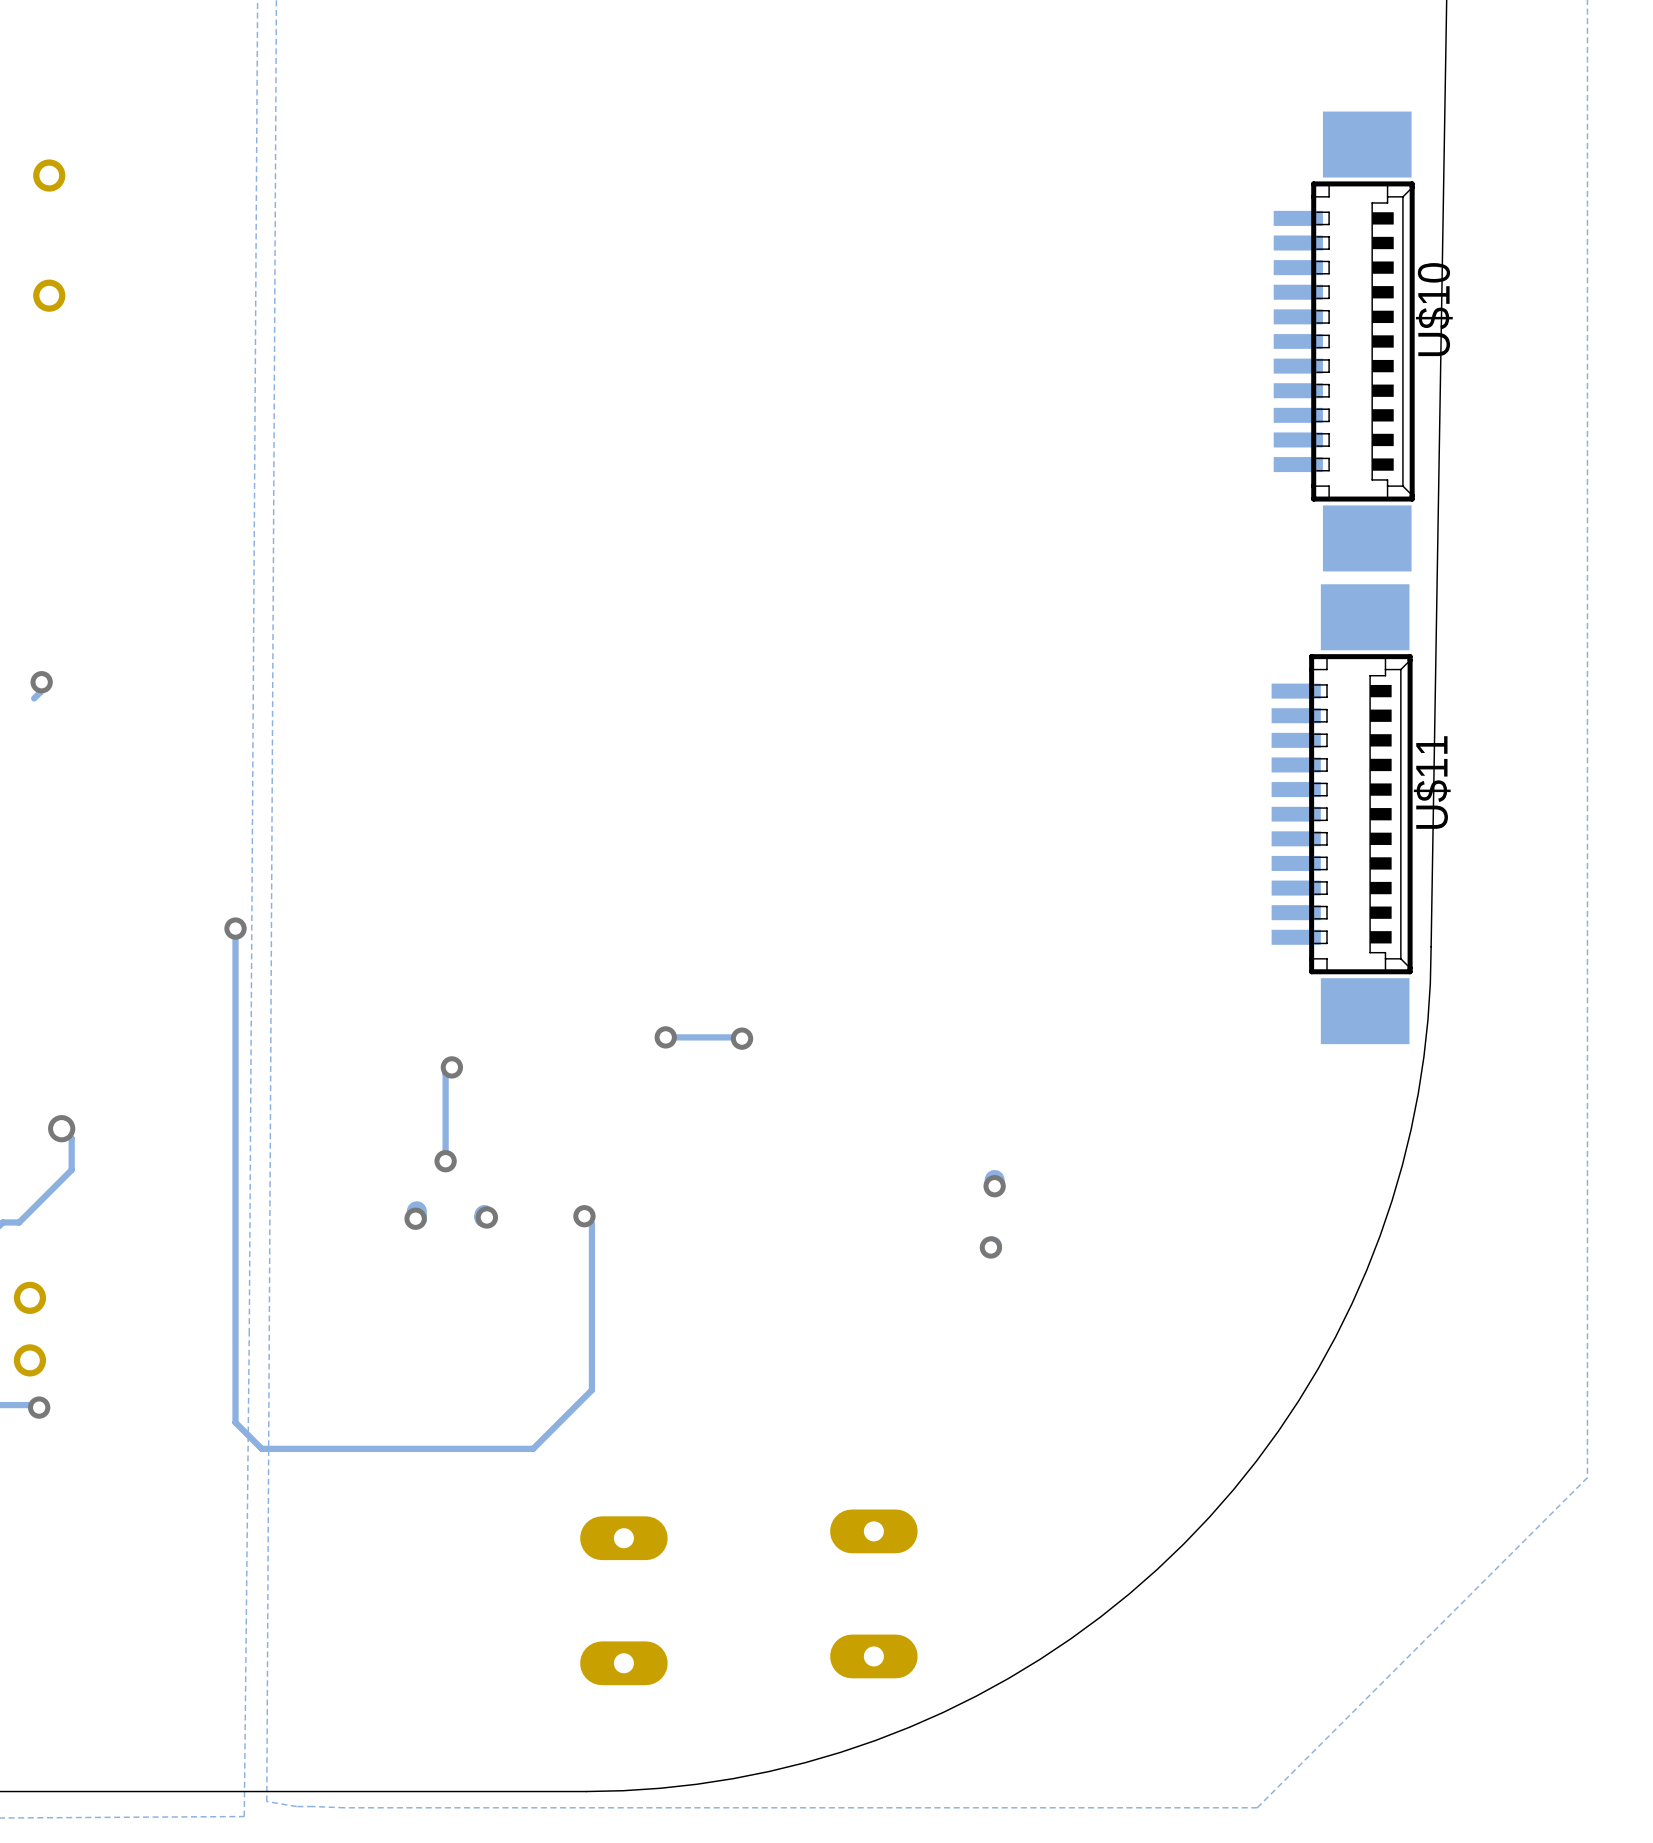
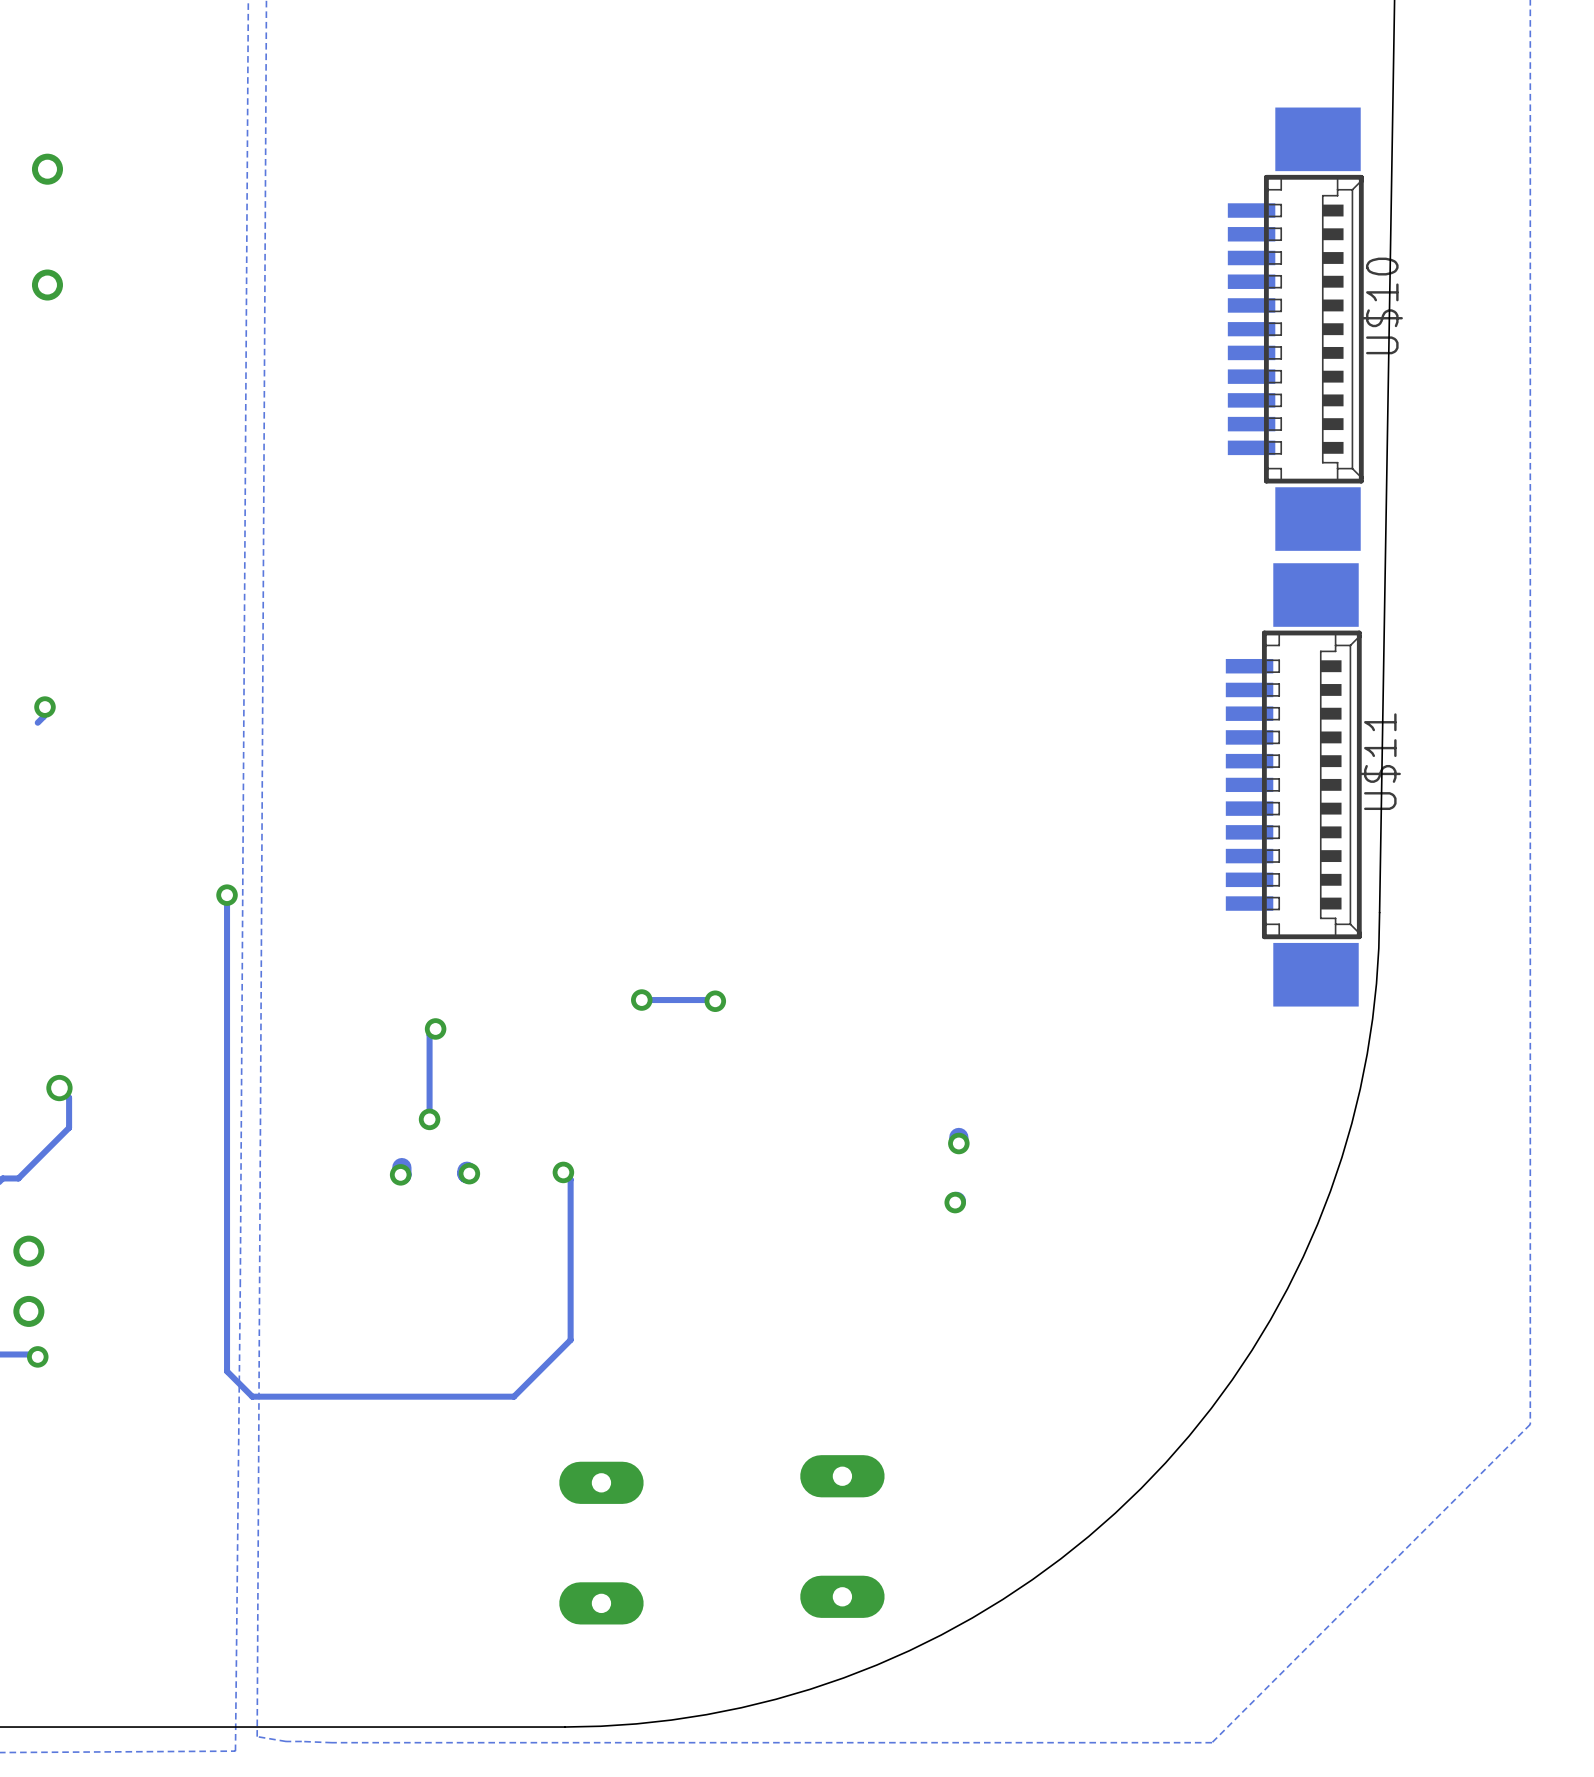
track: (41, 682) (40, 692) (34, 698) -> (44, 707) (43, 716) (37, 722)
via position: (41, 682) -> (44, 707)

